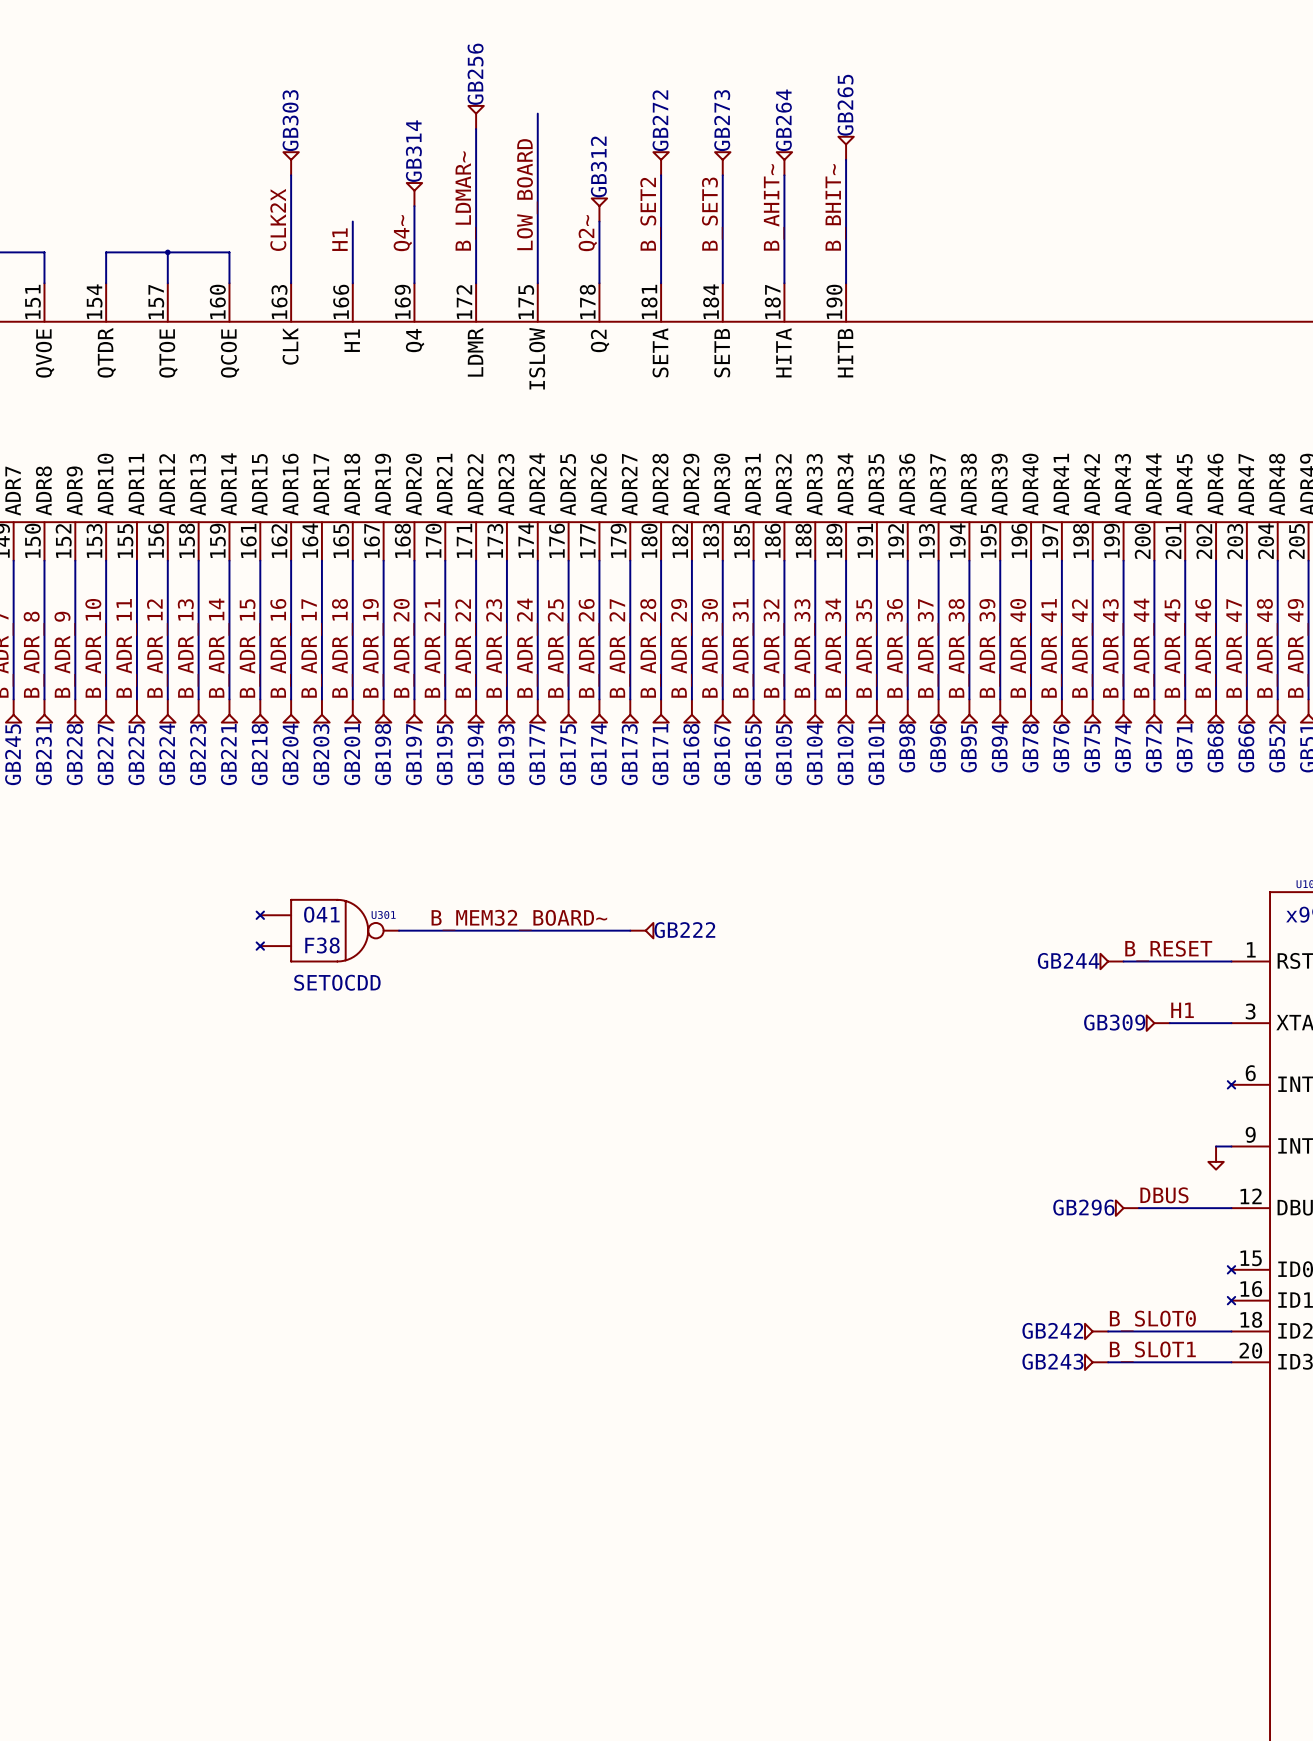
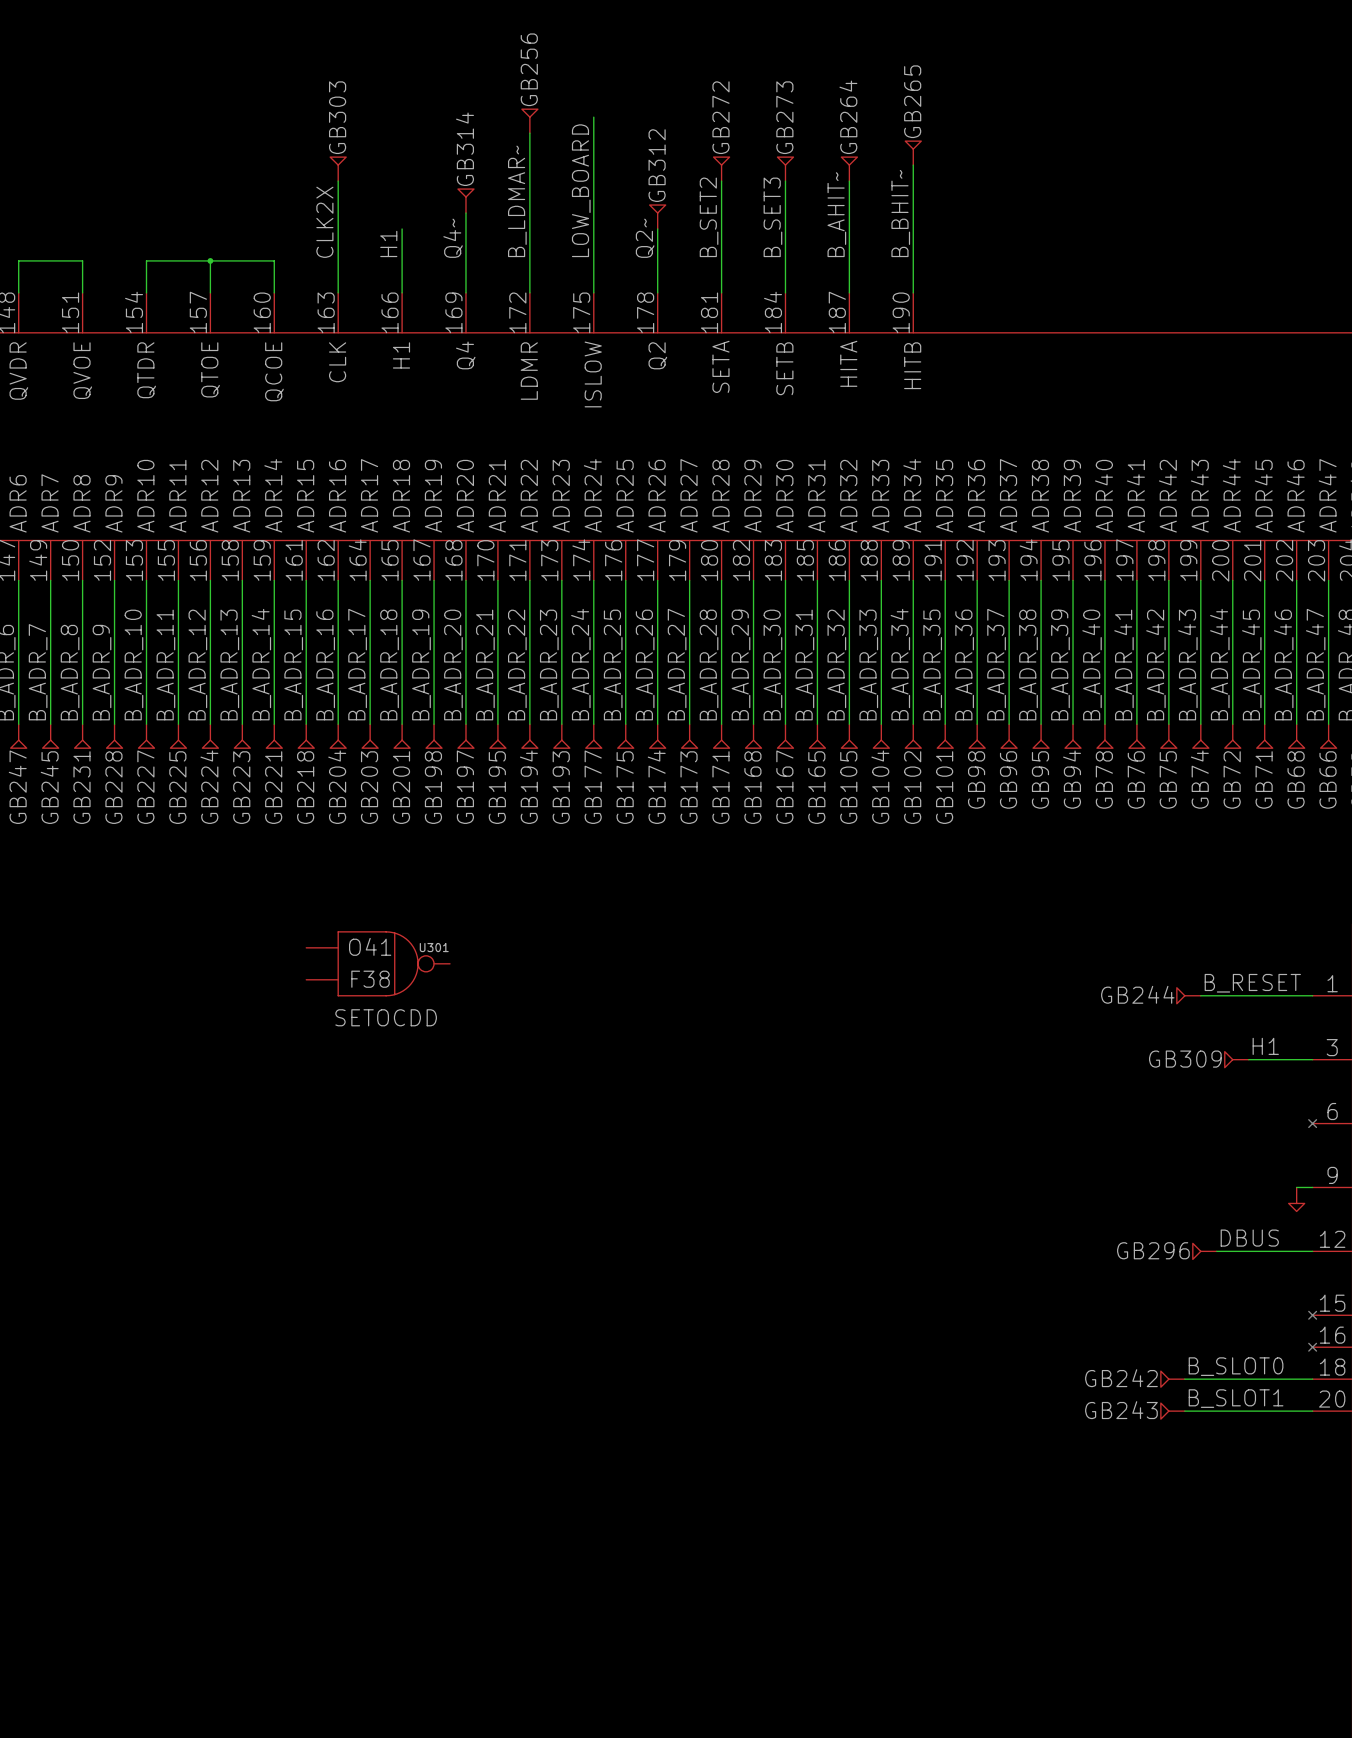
no-connect mark: (260, 915) -> none
label: B_MEM32_BOARD~ (519, 920) -> none
wire: (399, 930) (630, 930) -> none
GB222: (642, 930) -> none
no-connect mark: (260, 946) -> none

